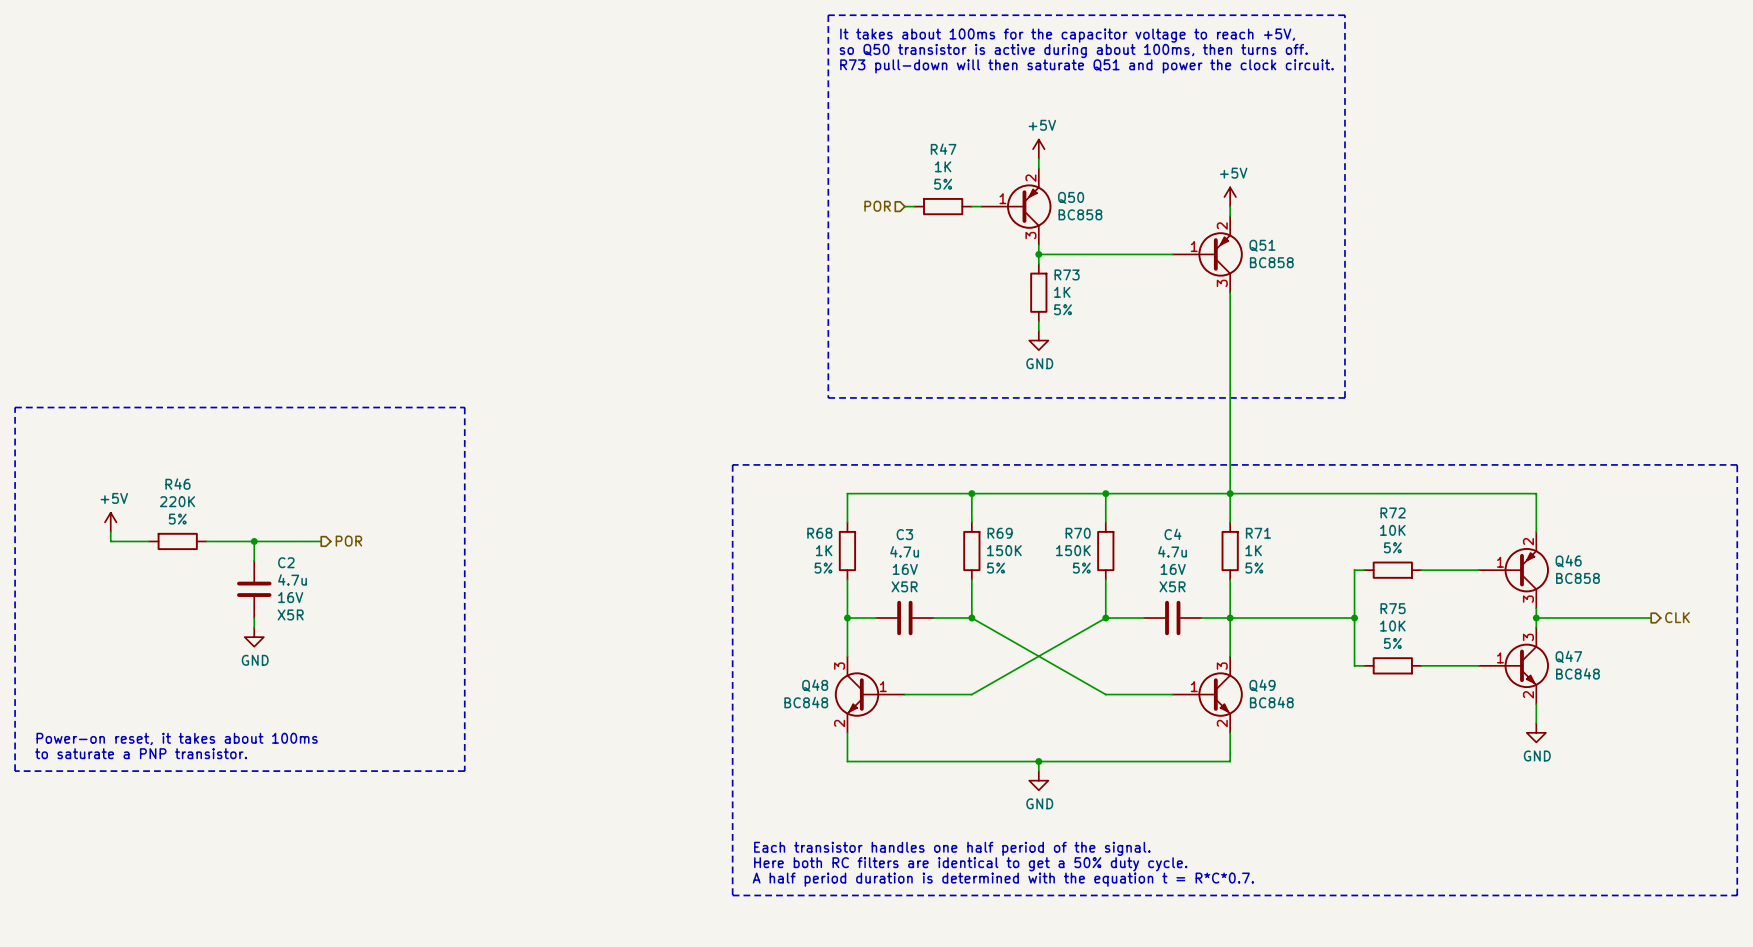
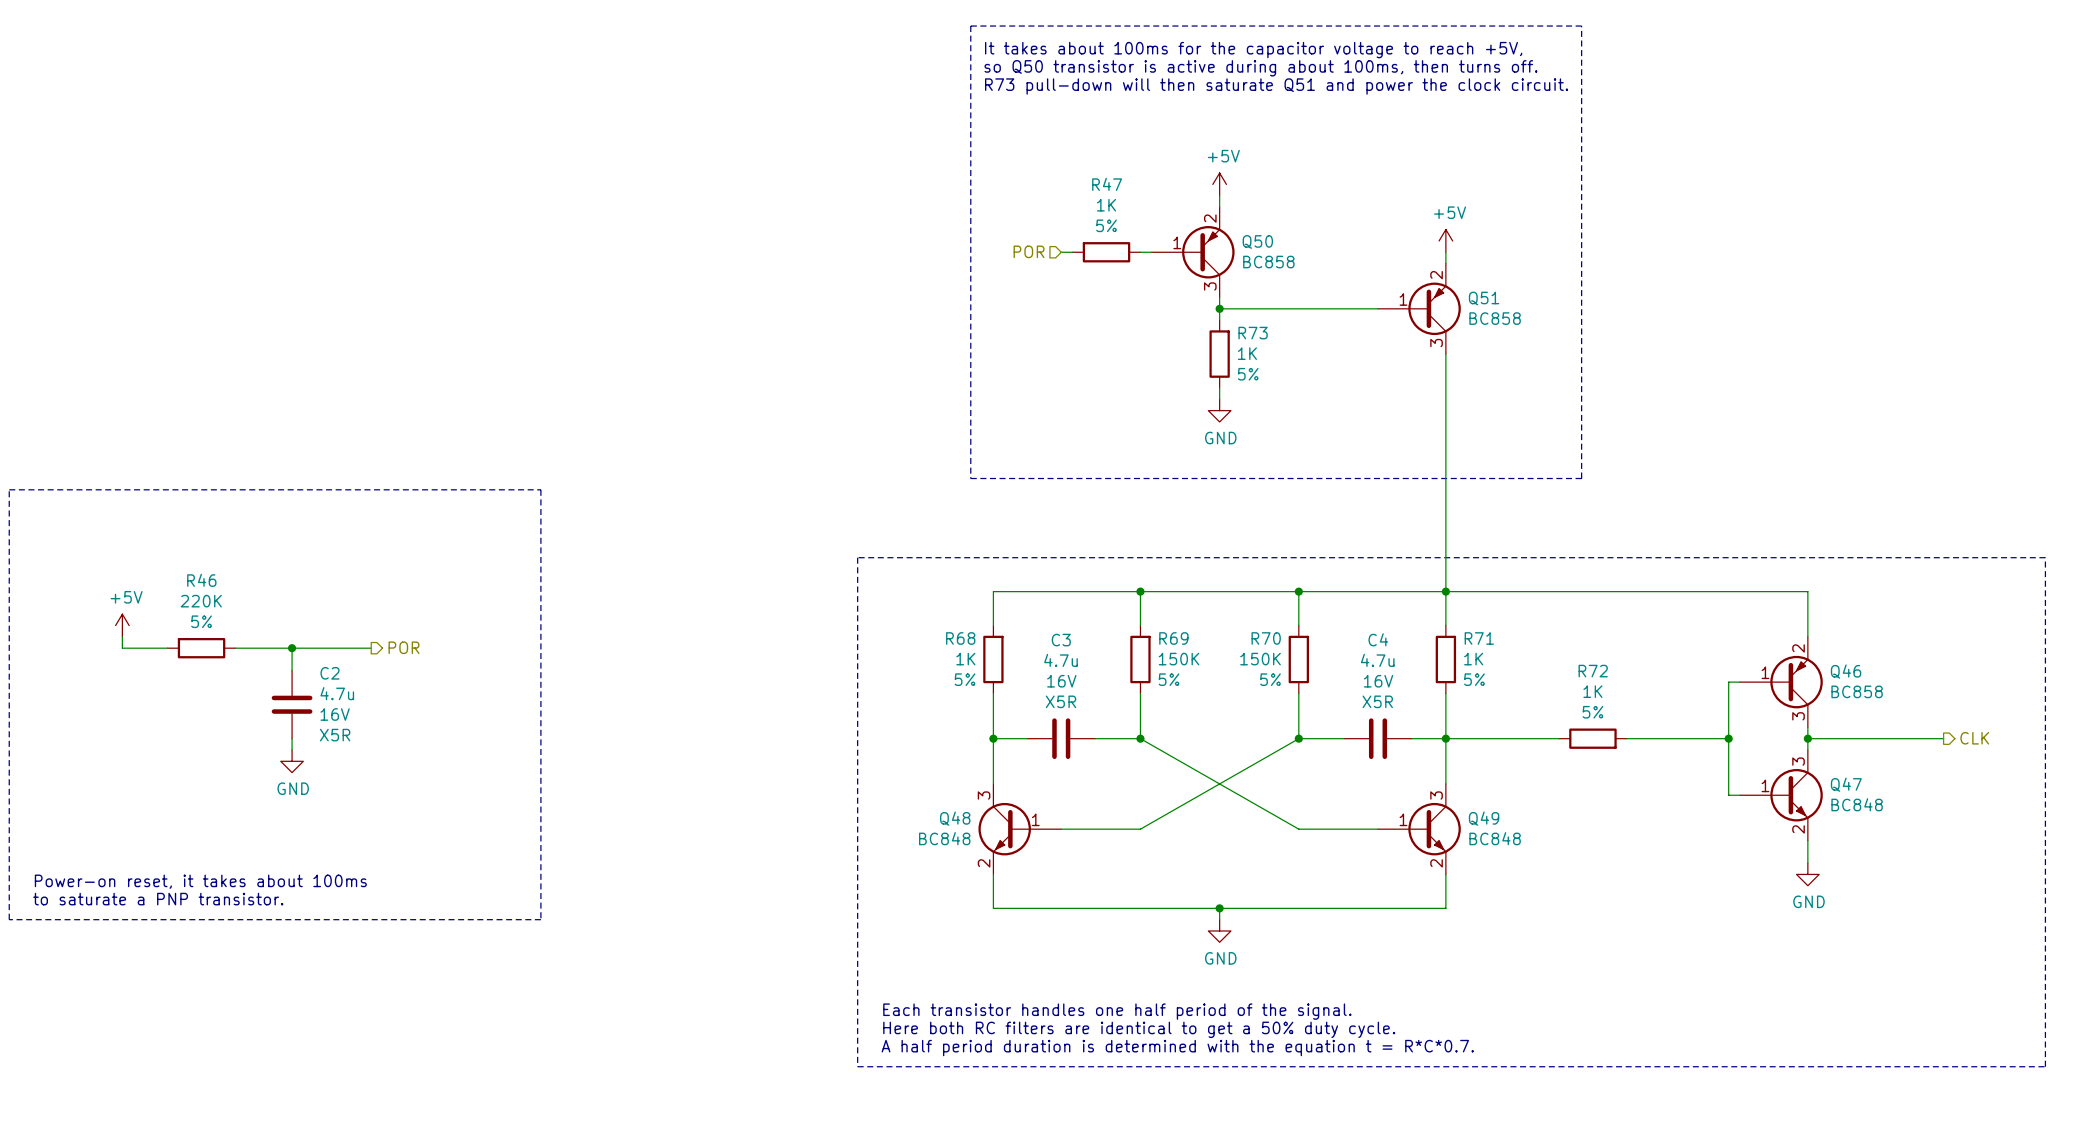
R72 value: 10K (1392, 530) -> 1K (1592, 691)
wire: (1364, 570) (1354, 570) (1354, 665) (1364, 665) -> none
R72 position: (1392, 570) -> (1592, 738)
wire: (1421, 570) (1469, 570) -> (1728, 795) (1728, 682)
wire: (1325, 618) (1354, 618) -> none
junction: (1354, 618) -> none
wire: none -> (1626, 738) (1728, 738)
junction: none -> (1728, 738)
R75: 10K (1392, 665) -> none
wire: (1421, 665) (1469, 665) -> none

